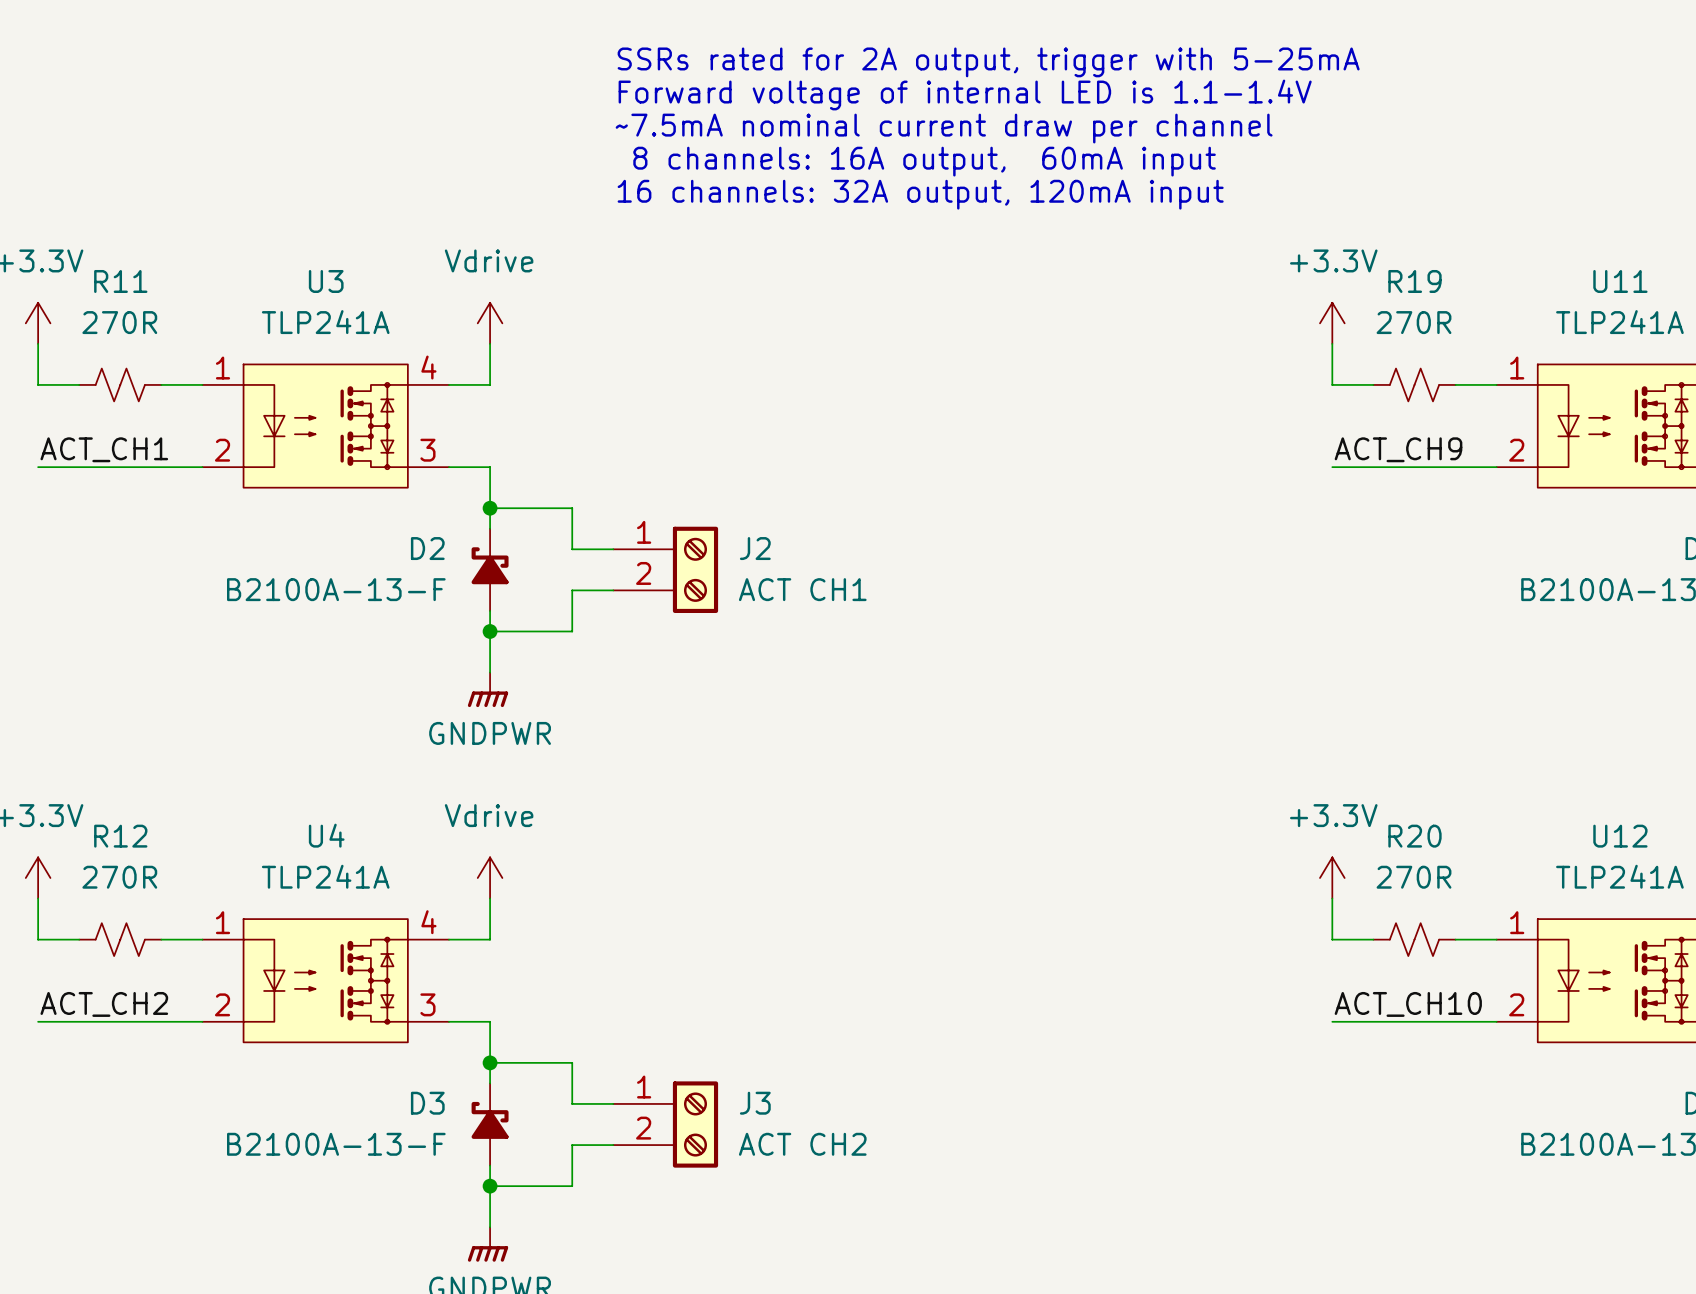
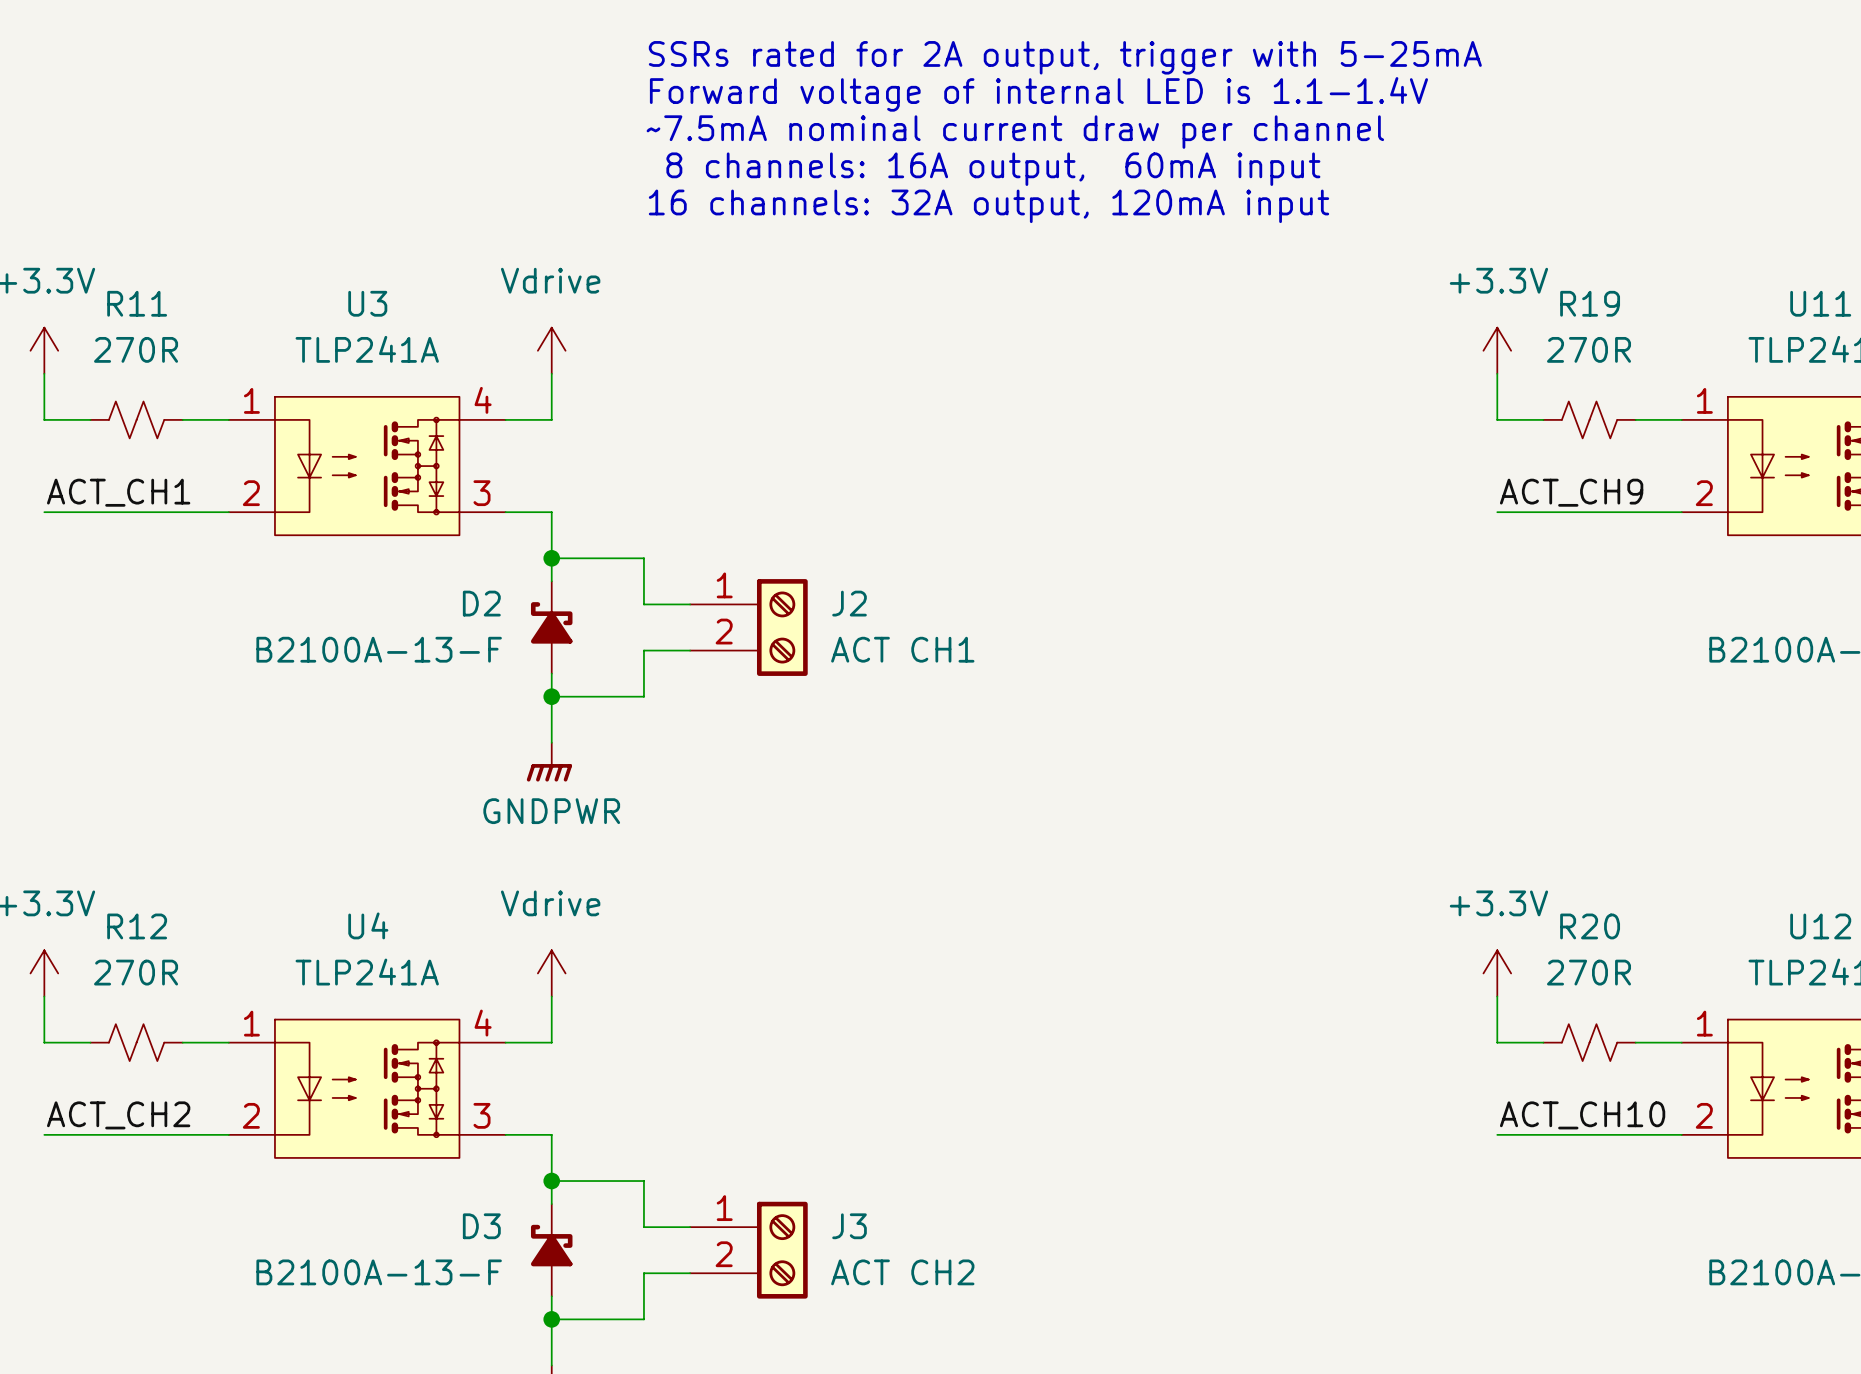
text position: SSRs rated for 2A output, trigger with 5-25mA (988, 62) -> SSRs rated for 2A output, trigger with 5-25mA (1065, 57)
text position: Forward voltage of internal LED is 1.1-1.4V (965, 94) -> Forward voltage of internal LED is 1.1-1.4V (1038, 94)
text position: ~7.5mA nominal current draw per channel (944, 128) -> ~7.5mA nominal current draw per channel (1015, 132)
text position: 8 channels: 16A output, 60mA input (924, 161) -> 8 channels: 16A output, 60mA input (993, 169)
text position: 16 channels: 32A output, 120mA input (920, 194) -> 16 channels: 32A output, 120mA input (988, 206)

